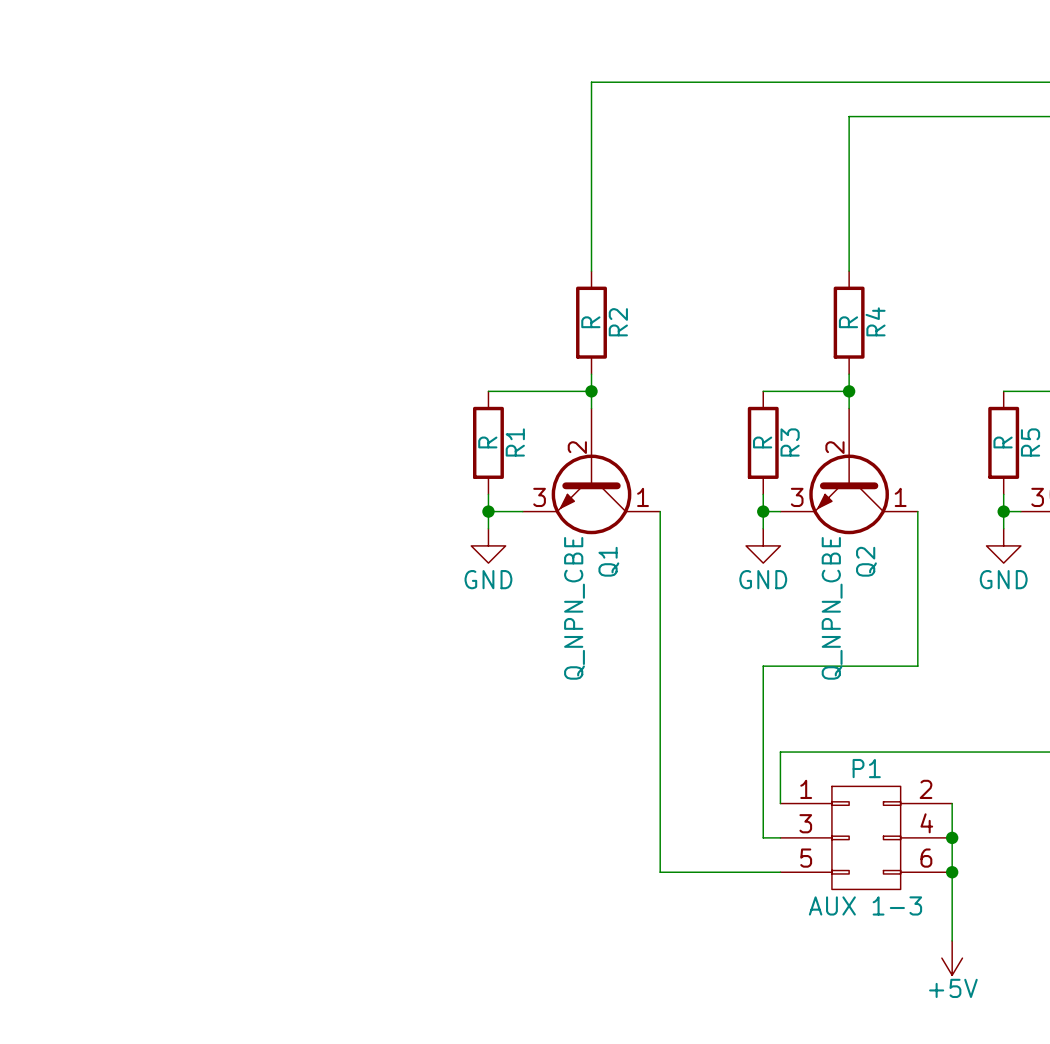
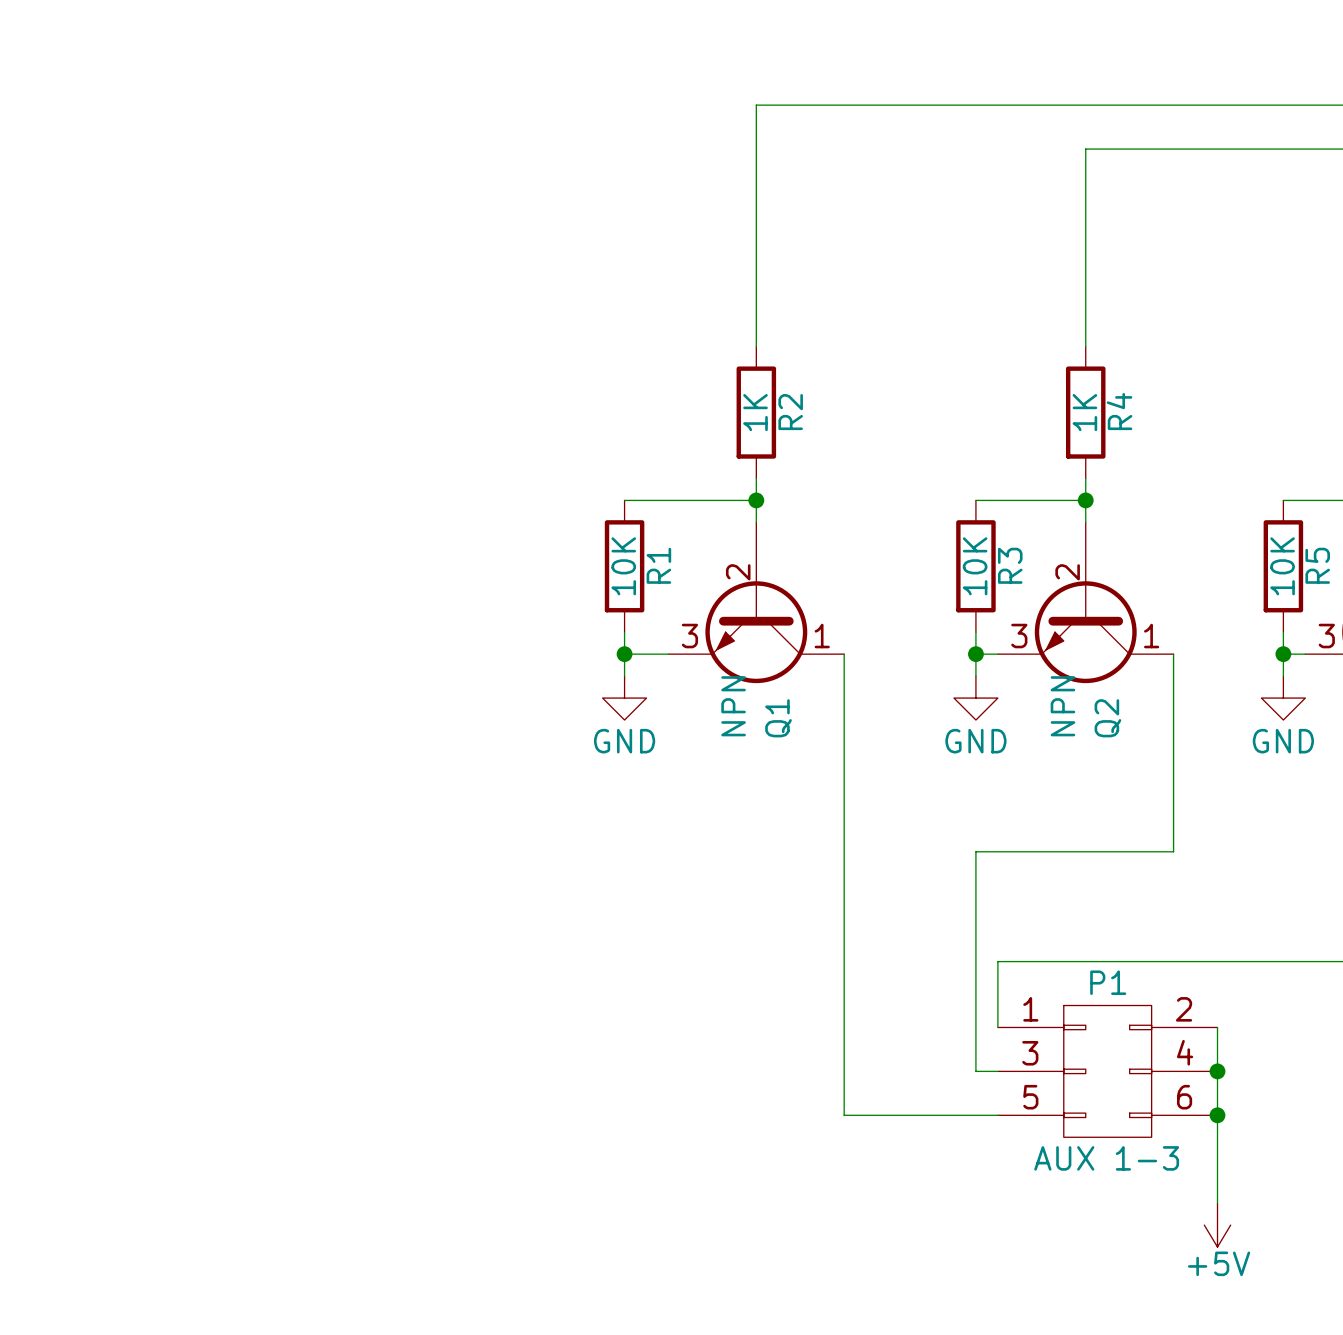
R2 value: R (590, 322) -> 1K (755, 412)
R4 value: R (848, 322) -> 1K (1084, 412)
R1 value: R (487, 442) -> 10K (623, 566)
R3 value: R (762, 442) -> 10K (975, 566)
R5 value: R (1003, 442) -> 10K (1282, 566)
Q1 value: Q_NPN_CBE (574, 608) -> NPN (733, 706)
Q2 value: Q_NPN_CBE (832, 608) -> NPN (1062, 706)

